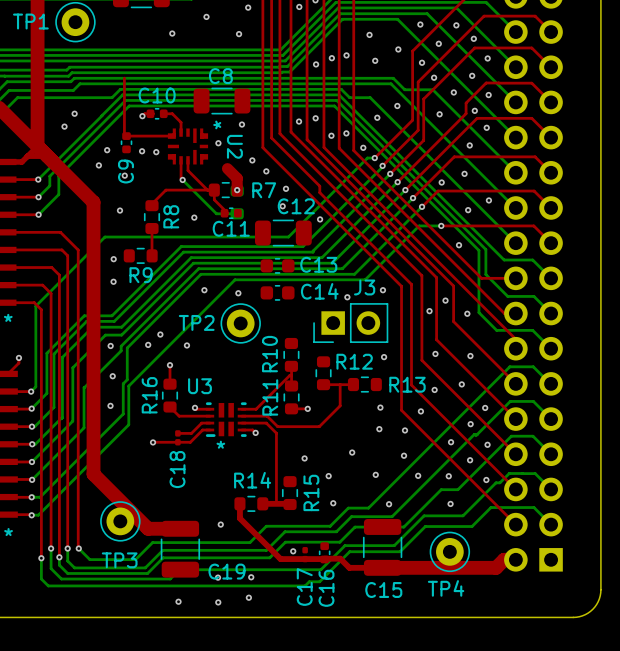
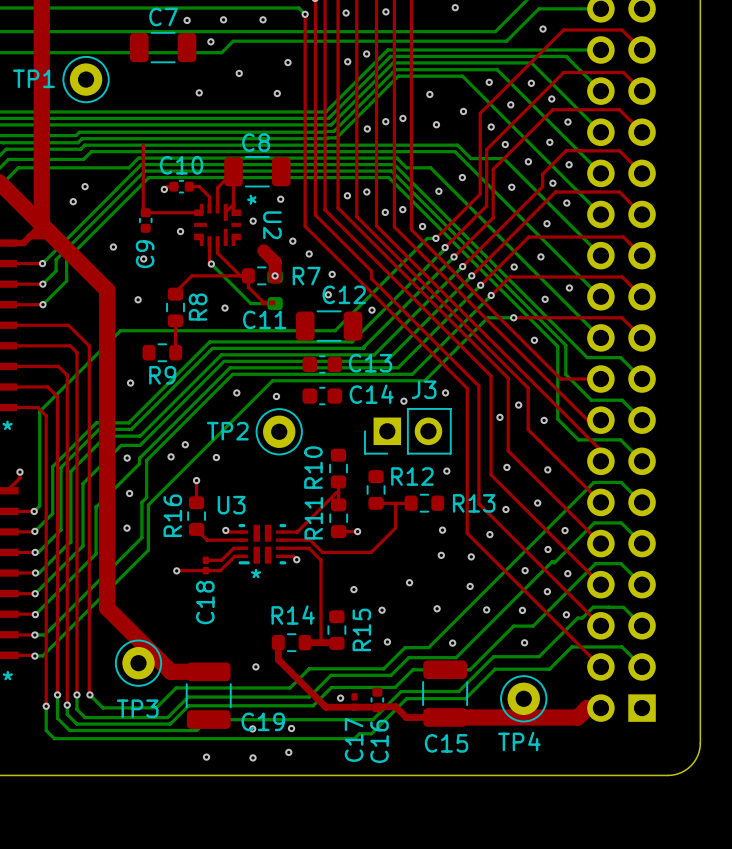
top track: none -> (217, 208) (217, 187) (233, 171) (233, 204) (225, 212)
via: (107, 150) -> none
via: (142, 151) -> none
C11 footprint: [220, 207, 242, 220] -> [260, 300, 276, 306]
via: (113, 259) -> none

